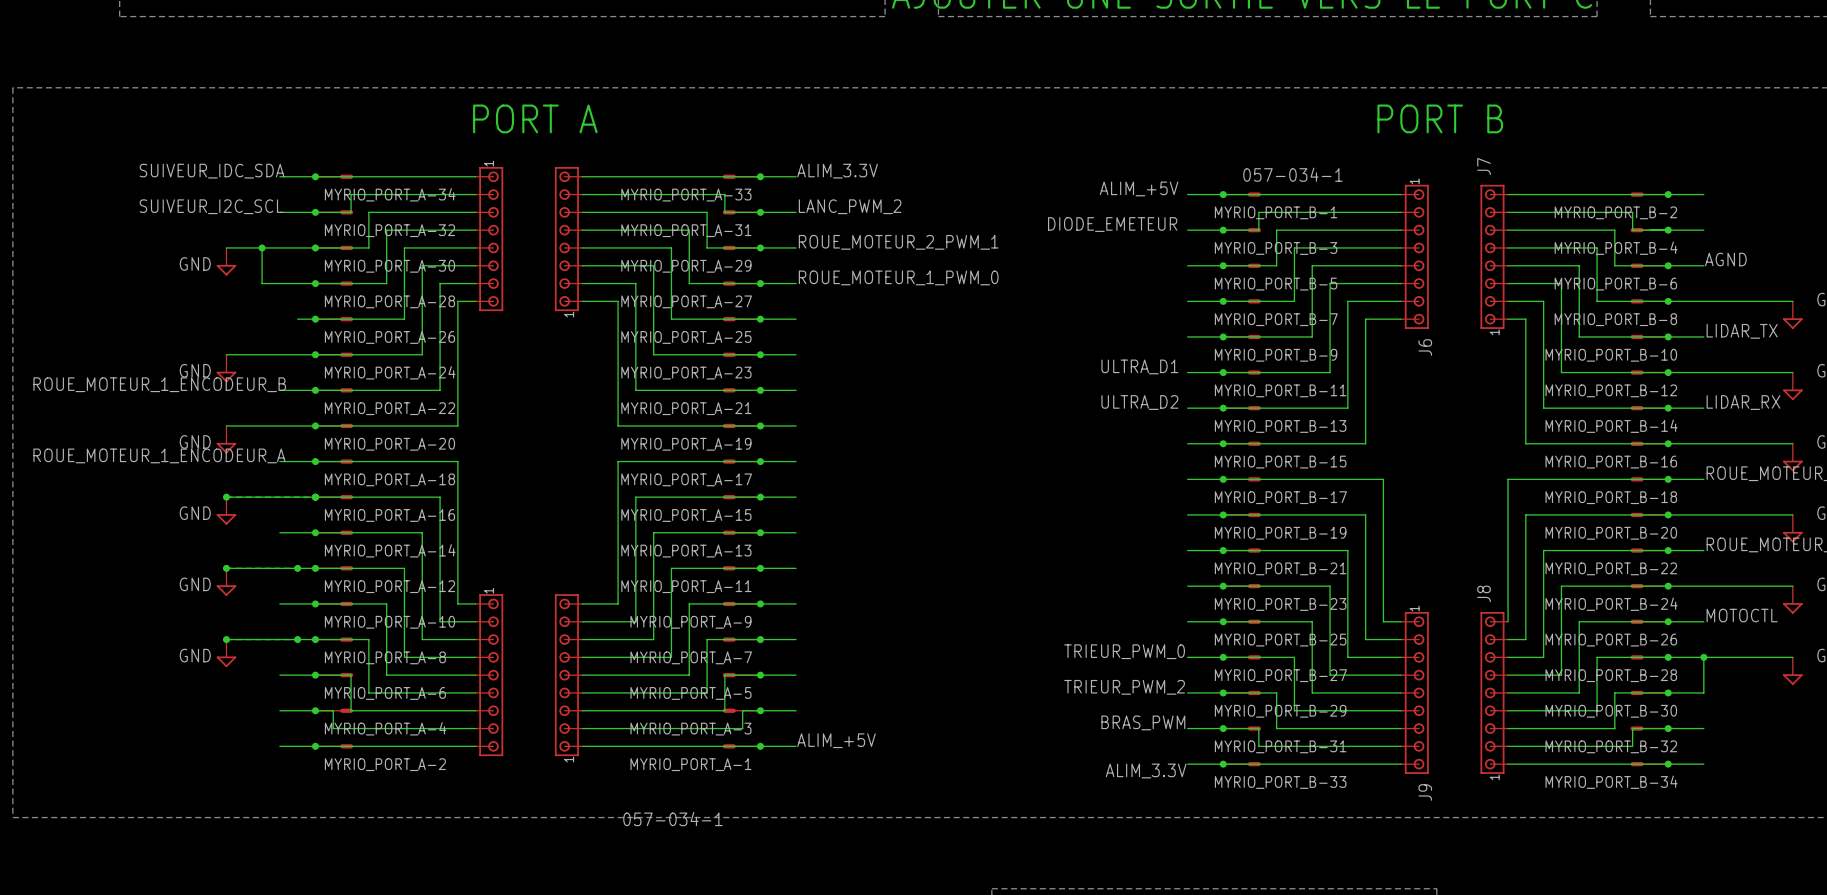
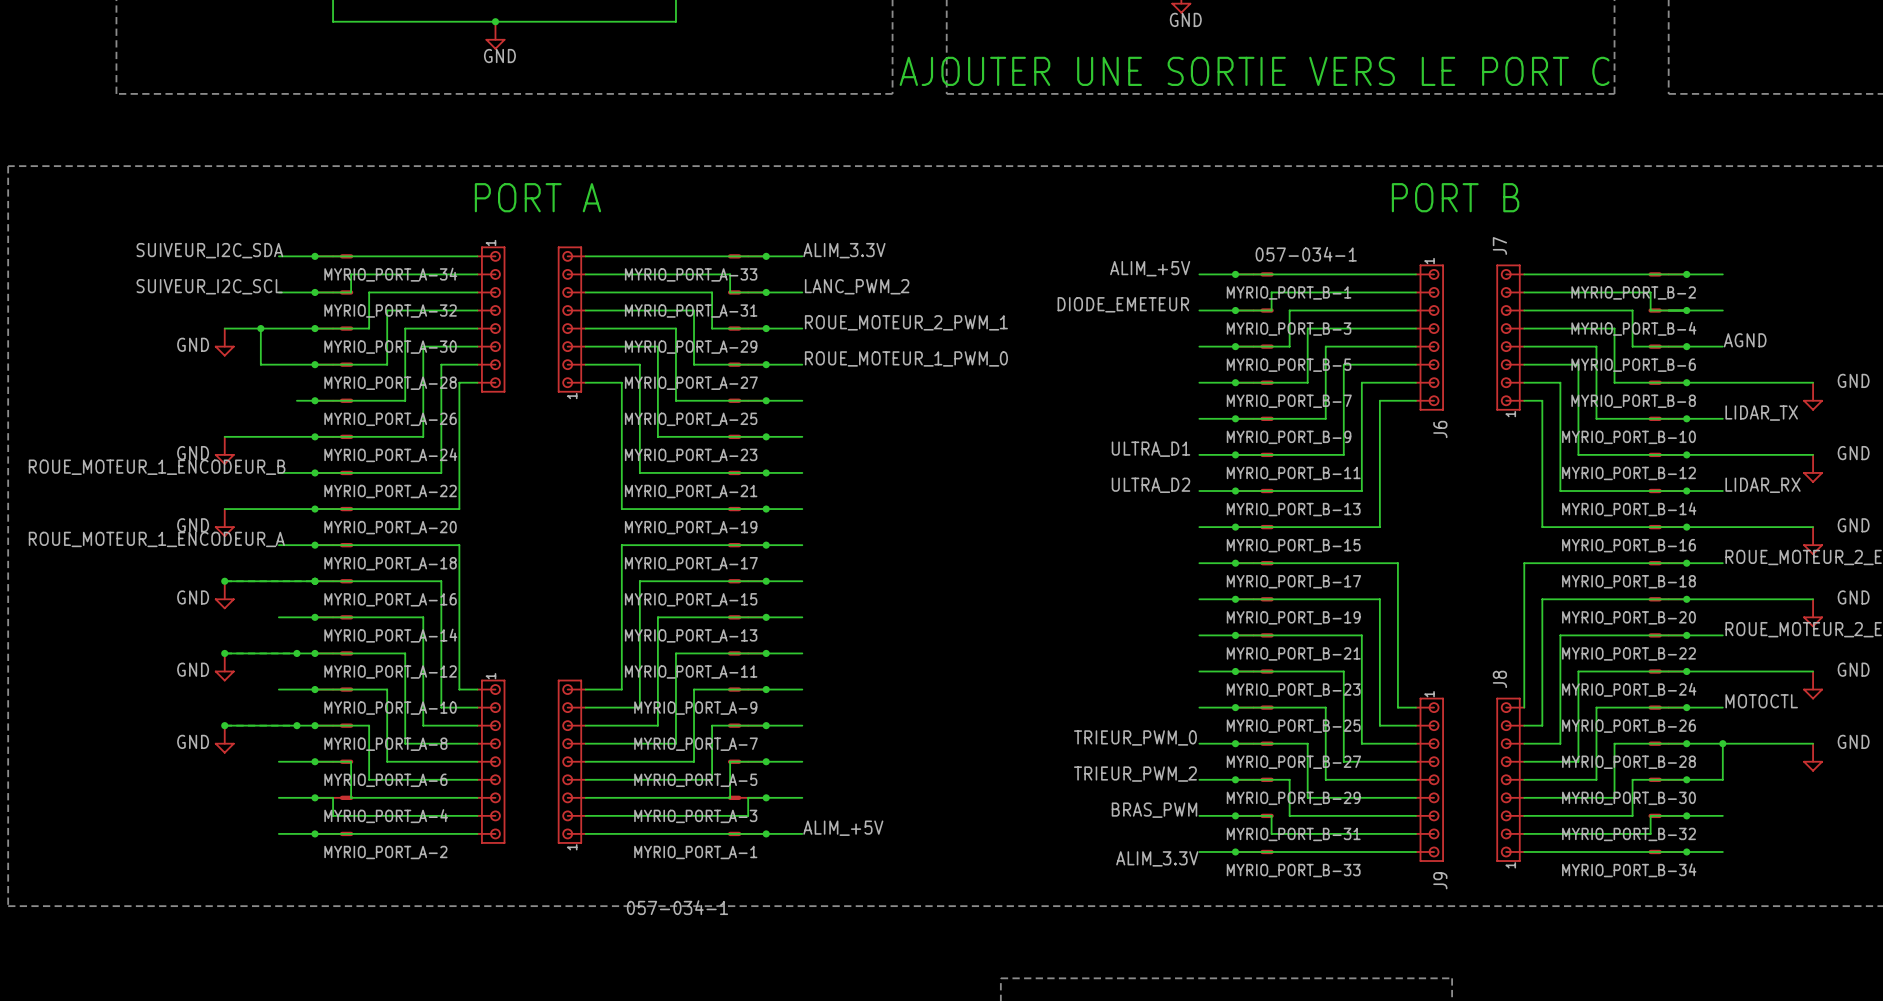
label: SUIVEUR_IDC_SDA (212, 171) -> SUIVEUR_I2C_SDA (209, 250)

